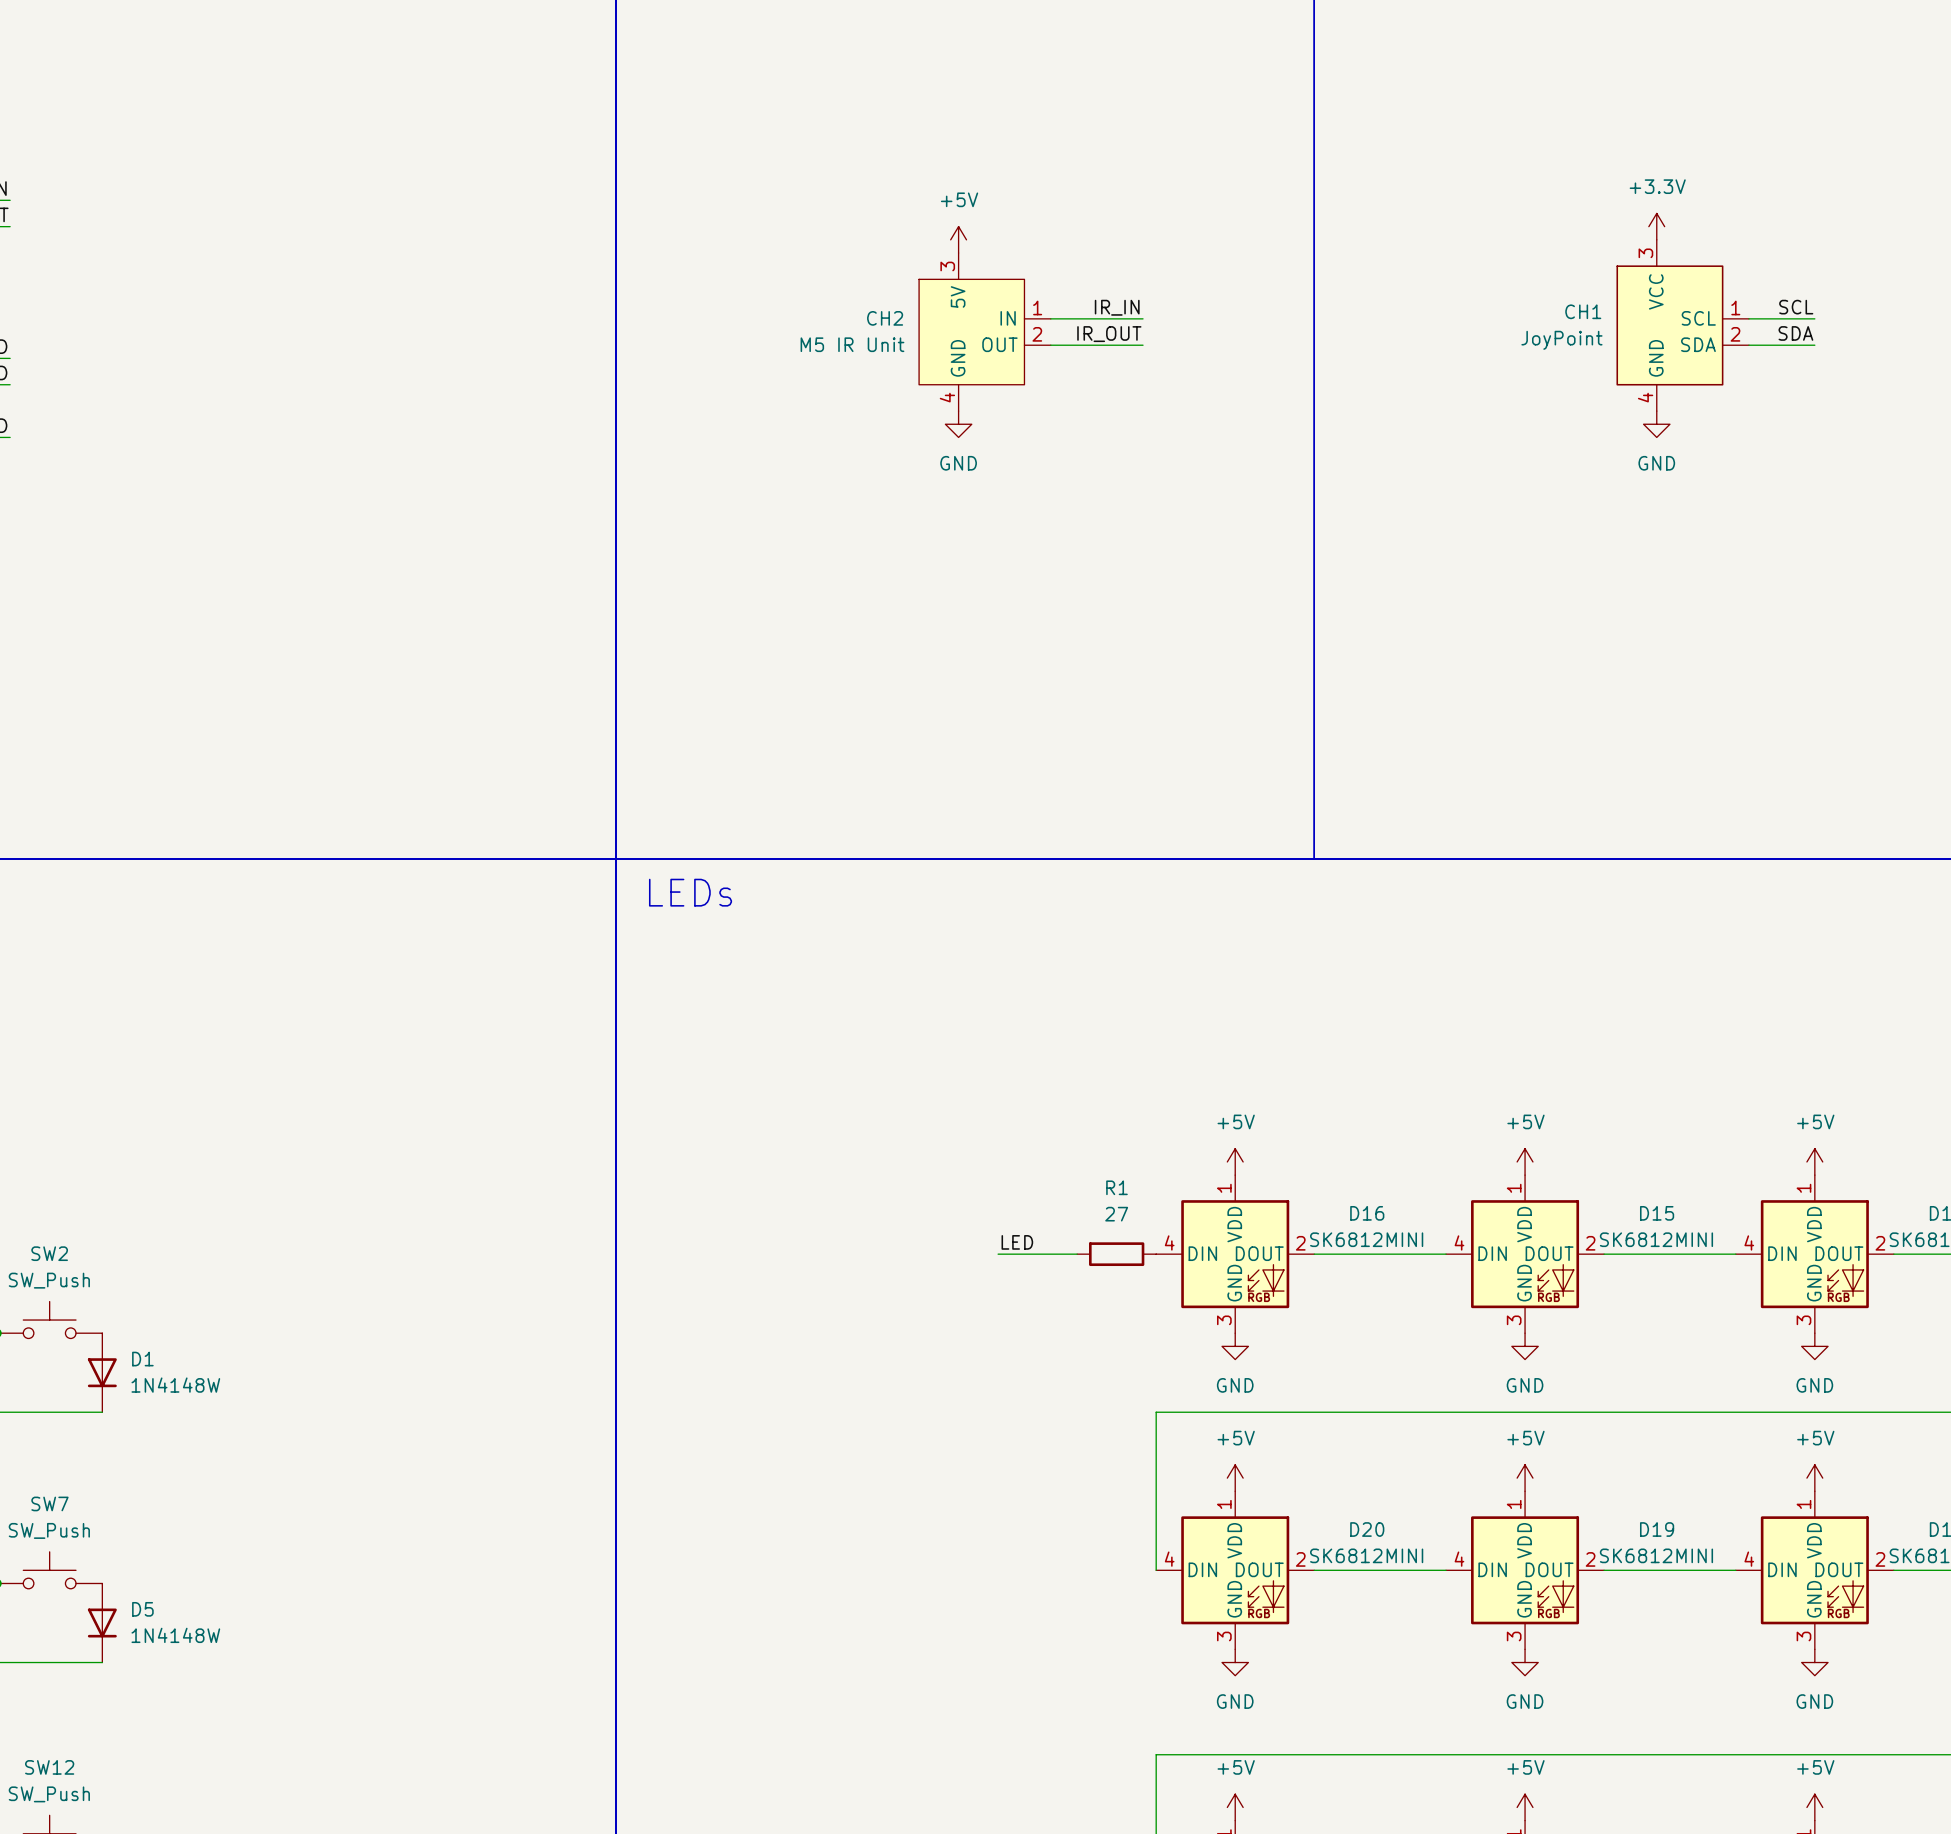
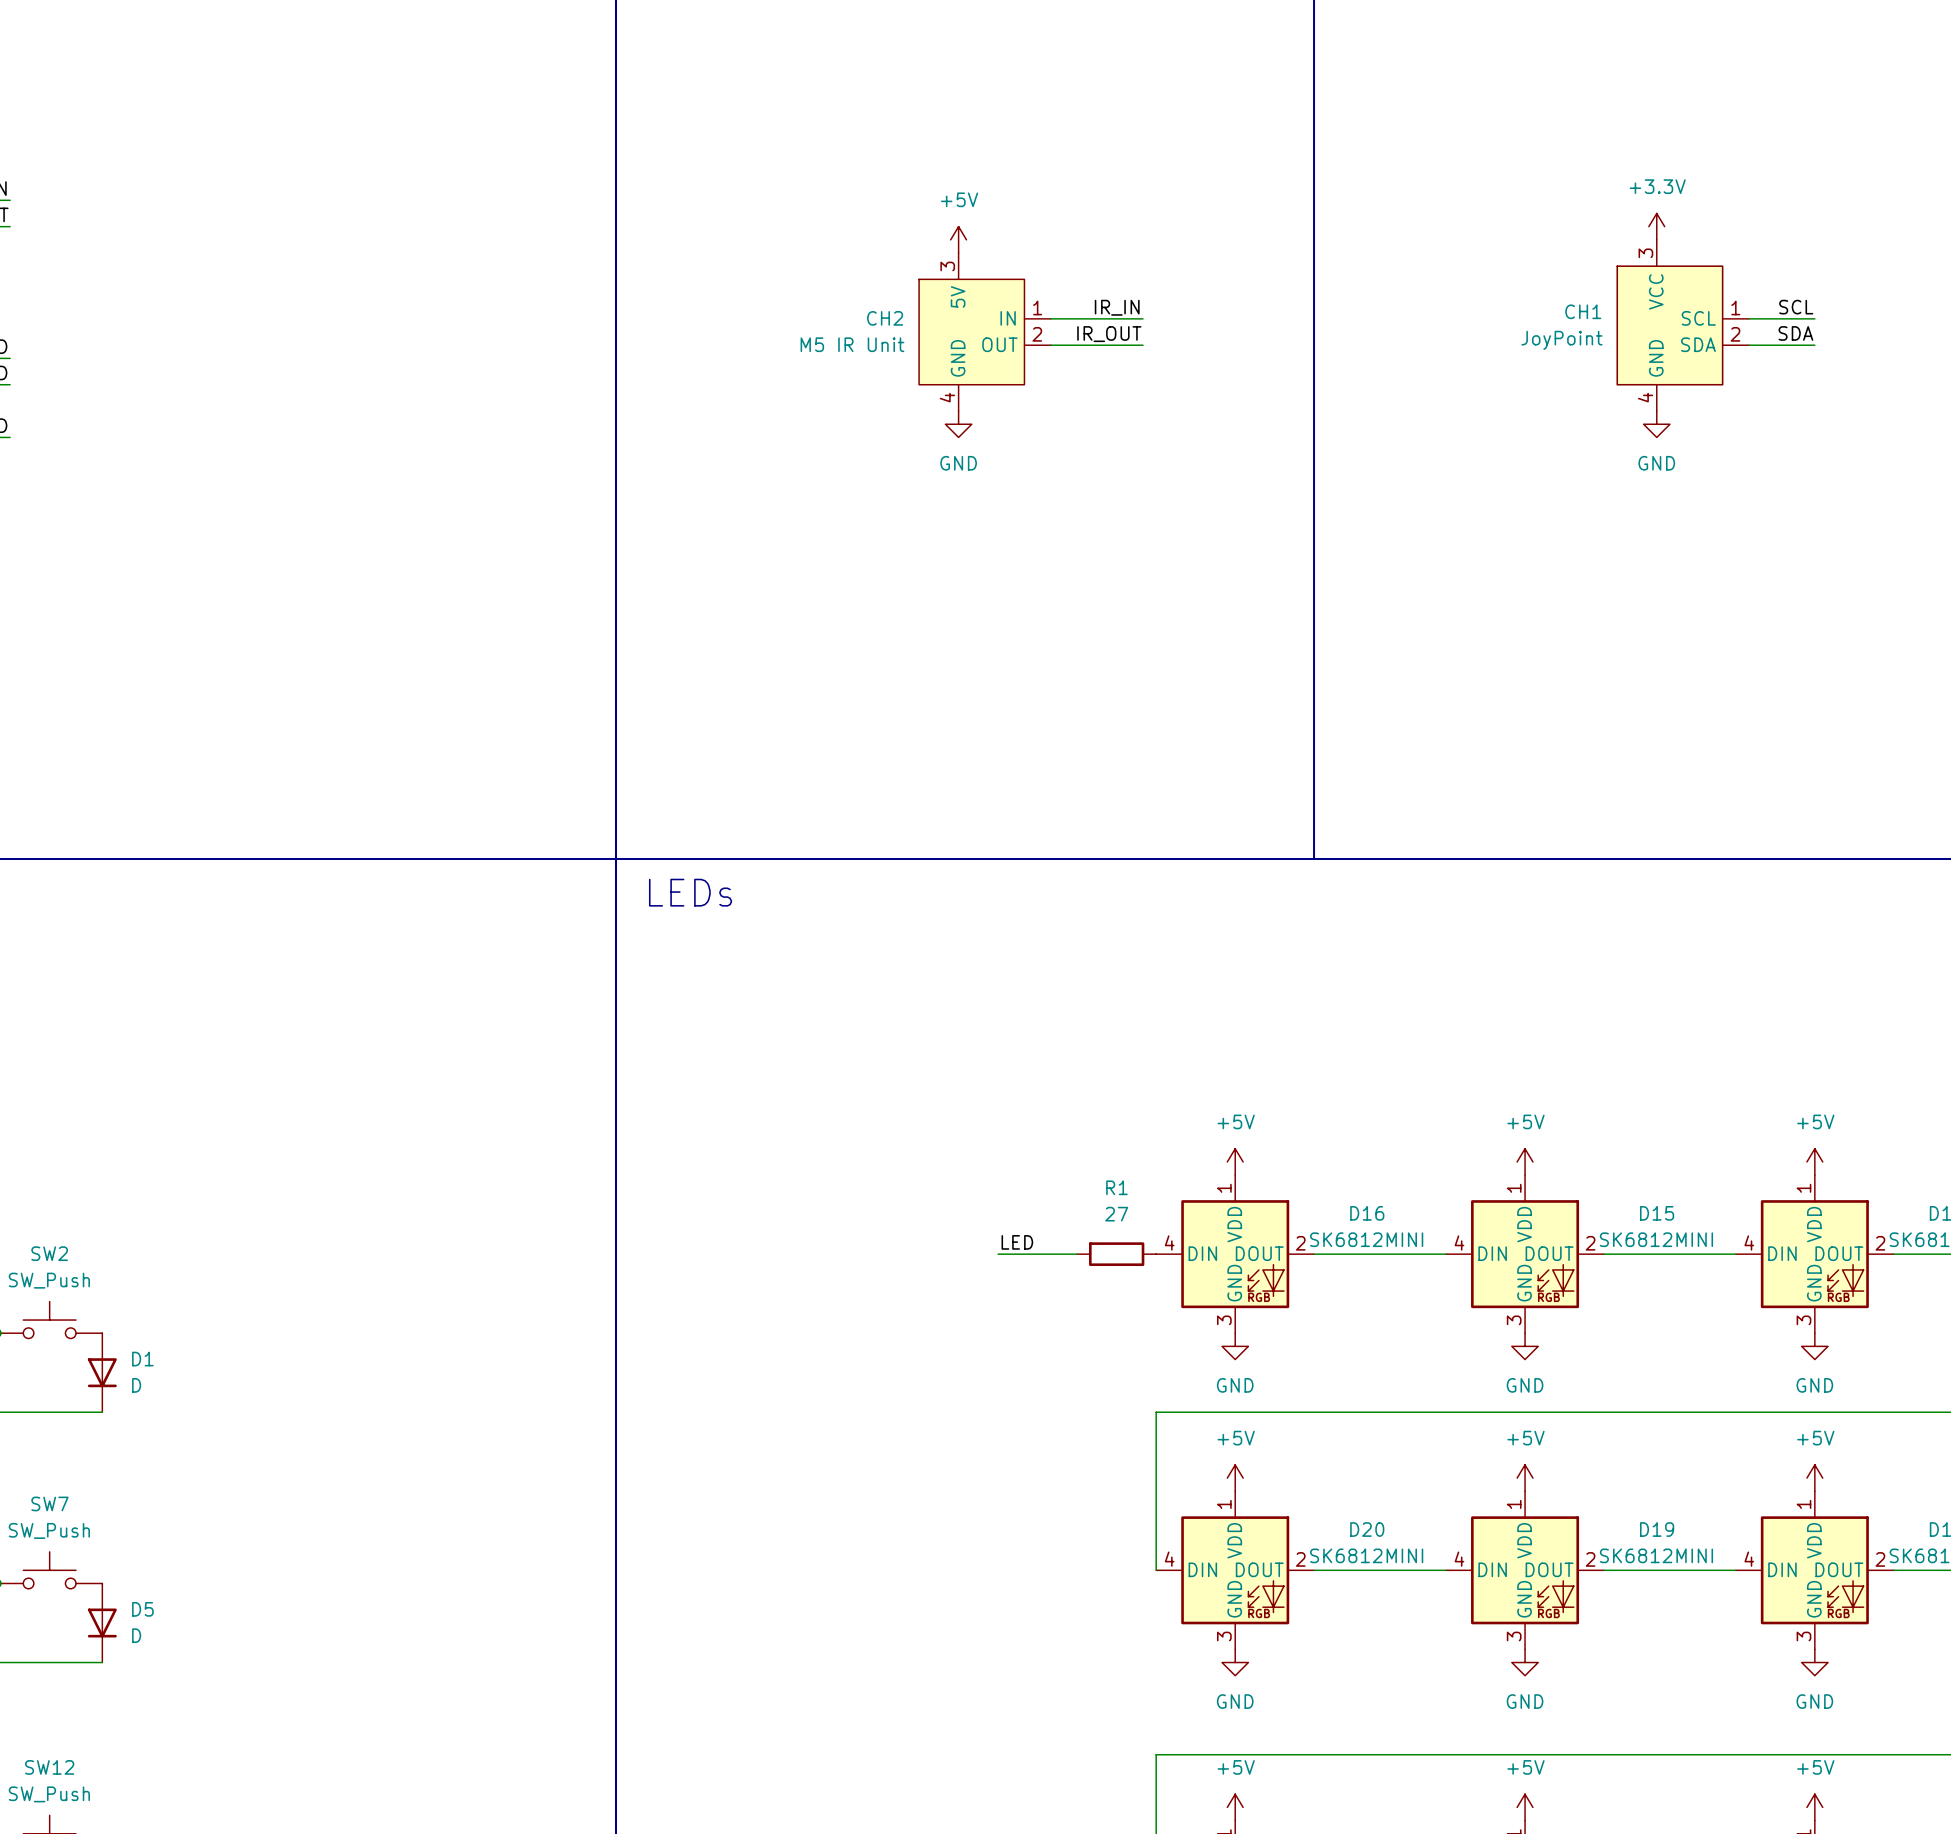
D1 value: 1N4148W (175, 1385) -> D (136, 1385)
D5 value: 1N4148W (175, 1635) -> D (136, 1635)

